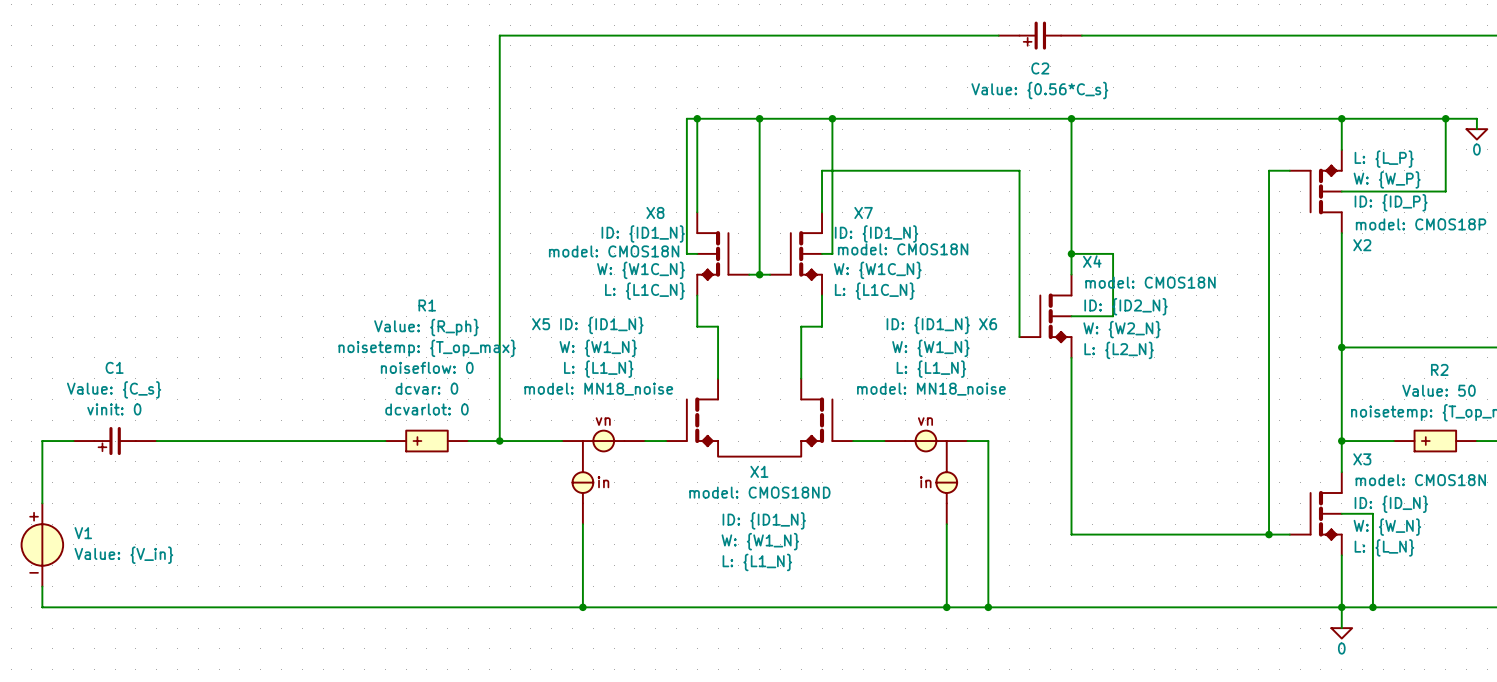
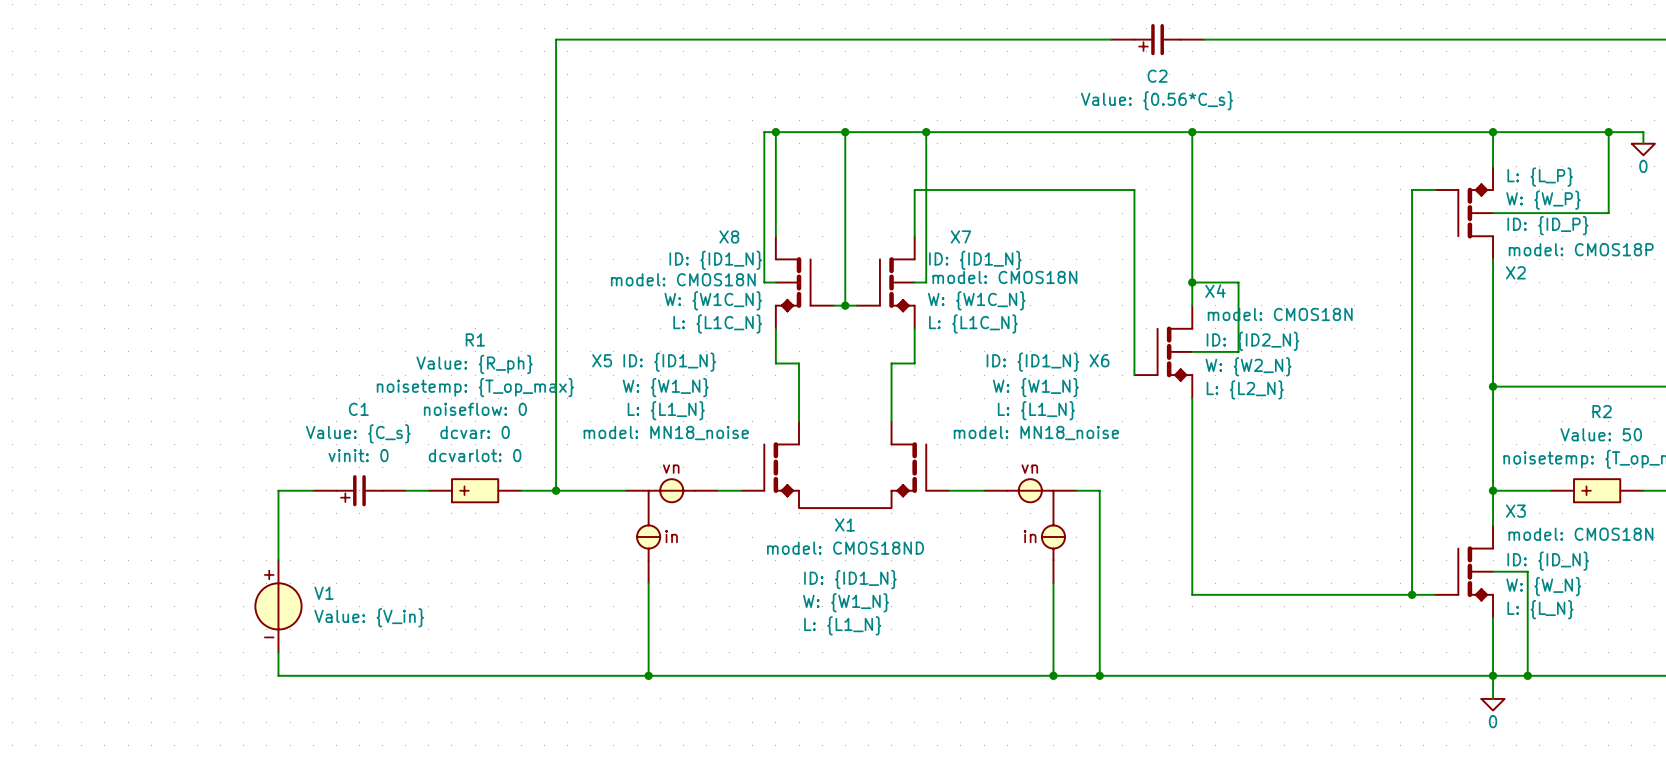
wire: (73, 441) (42, 441) (42, 503) -> none
C1 position: (115, 441) -> (359, 490)
wire: (156, 441) (250, 441) -> (278, 560) (278, 490)
V1 position: (42, 544) -> (278, 606)
wire: (42, 586) (42, 607) (250, 607) -> (278, 652) (278, 675)

